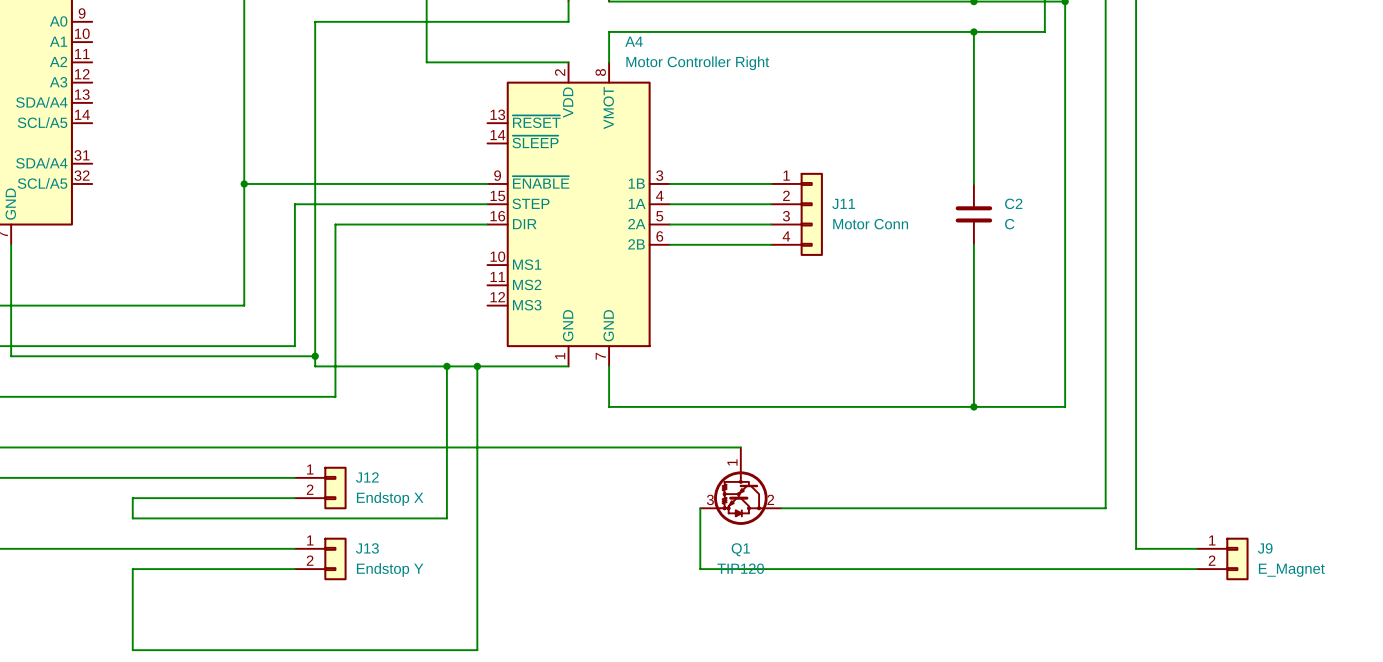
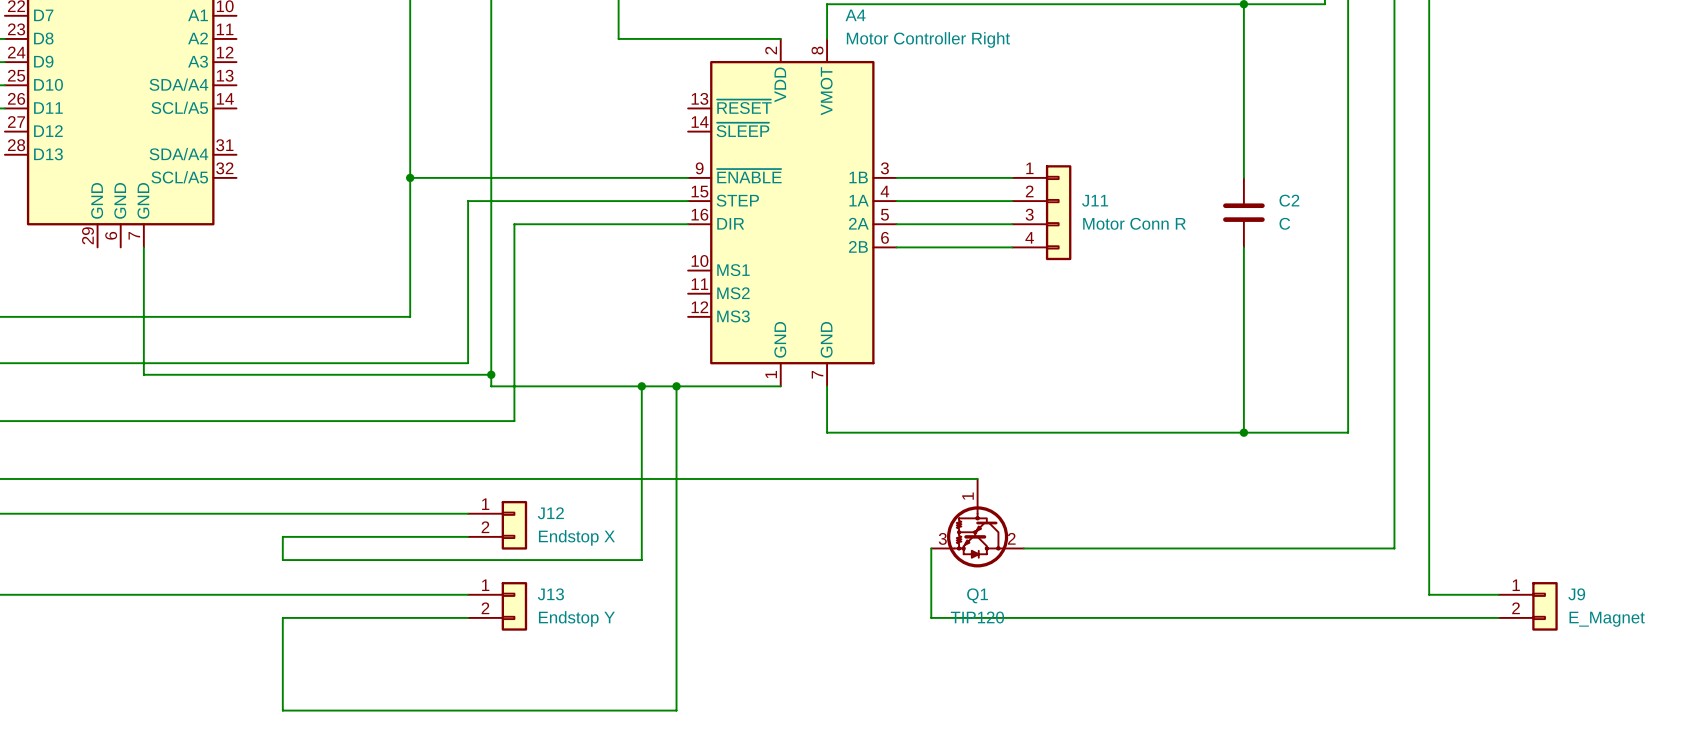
J11 value: Motor Conn (870, 224) -> Motor Conn R (1134, 223)

